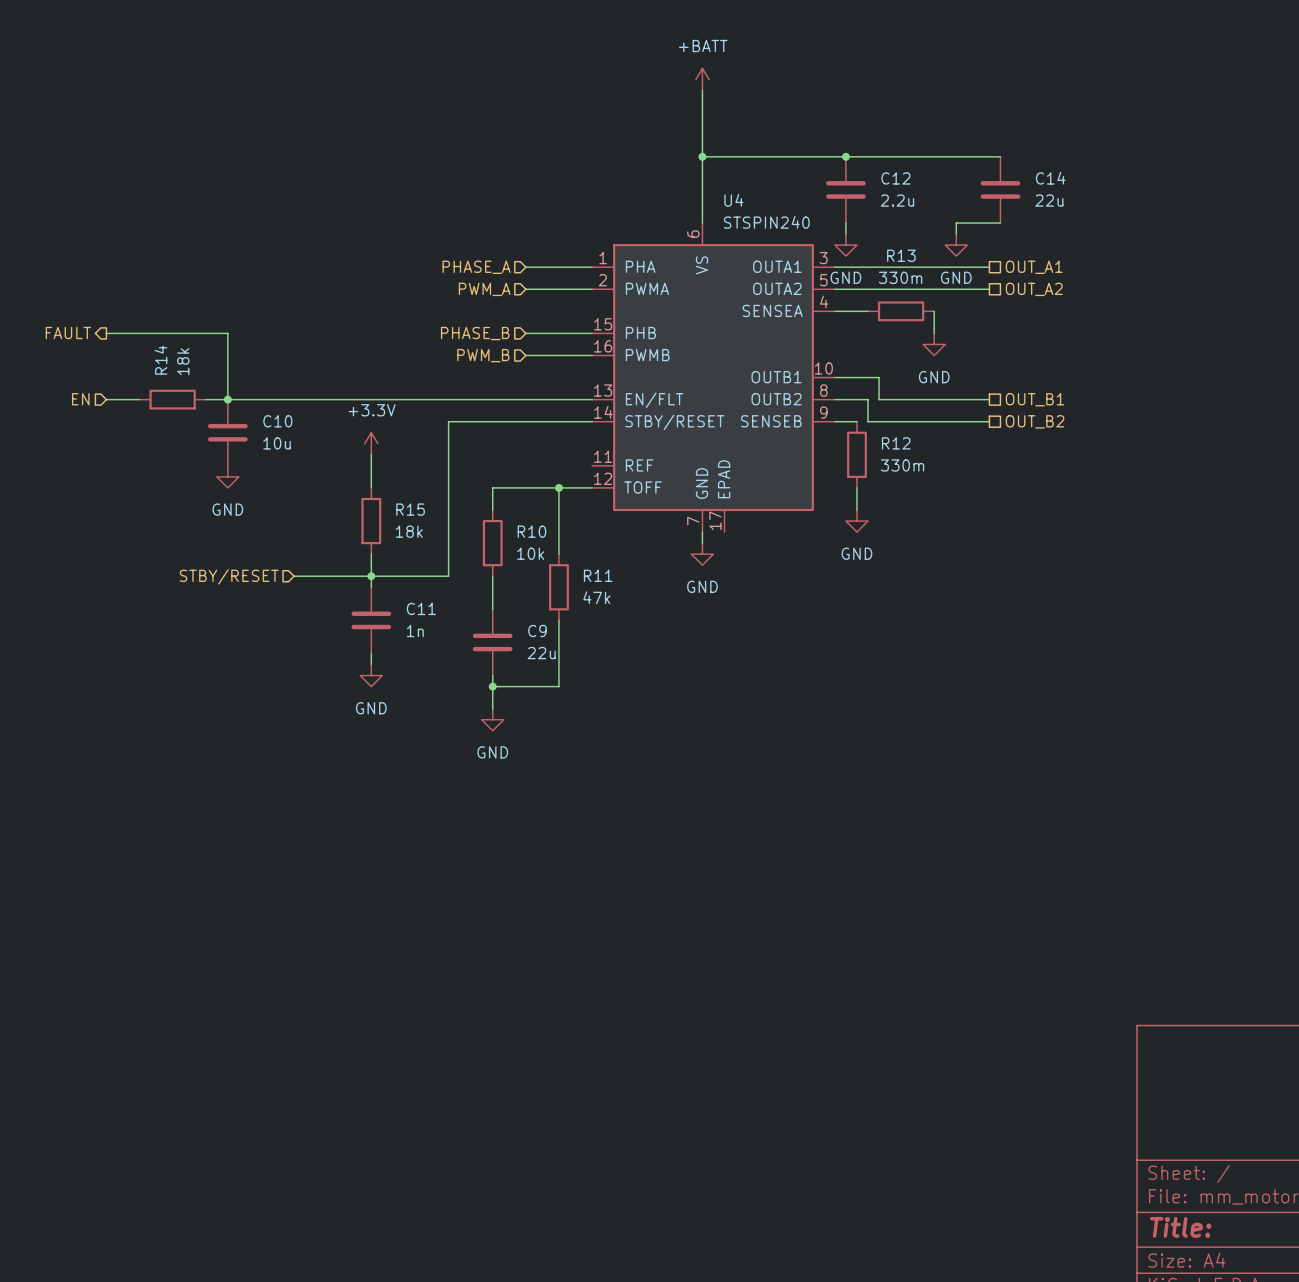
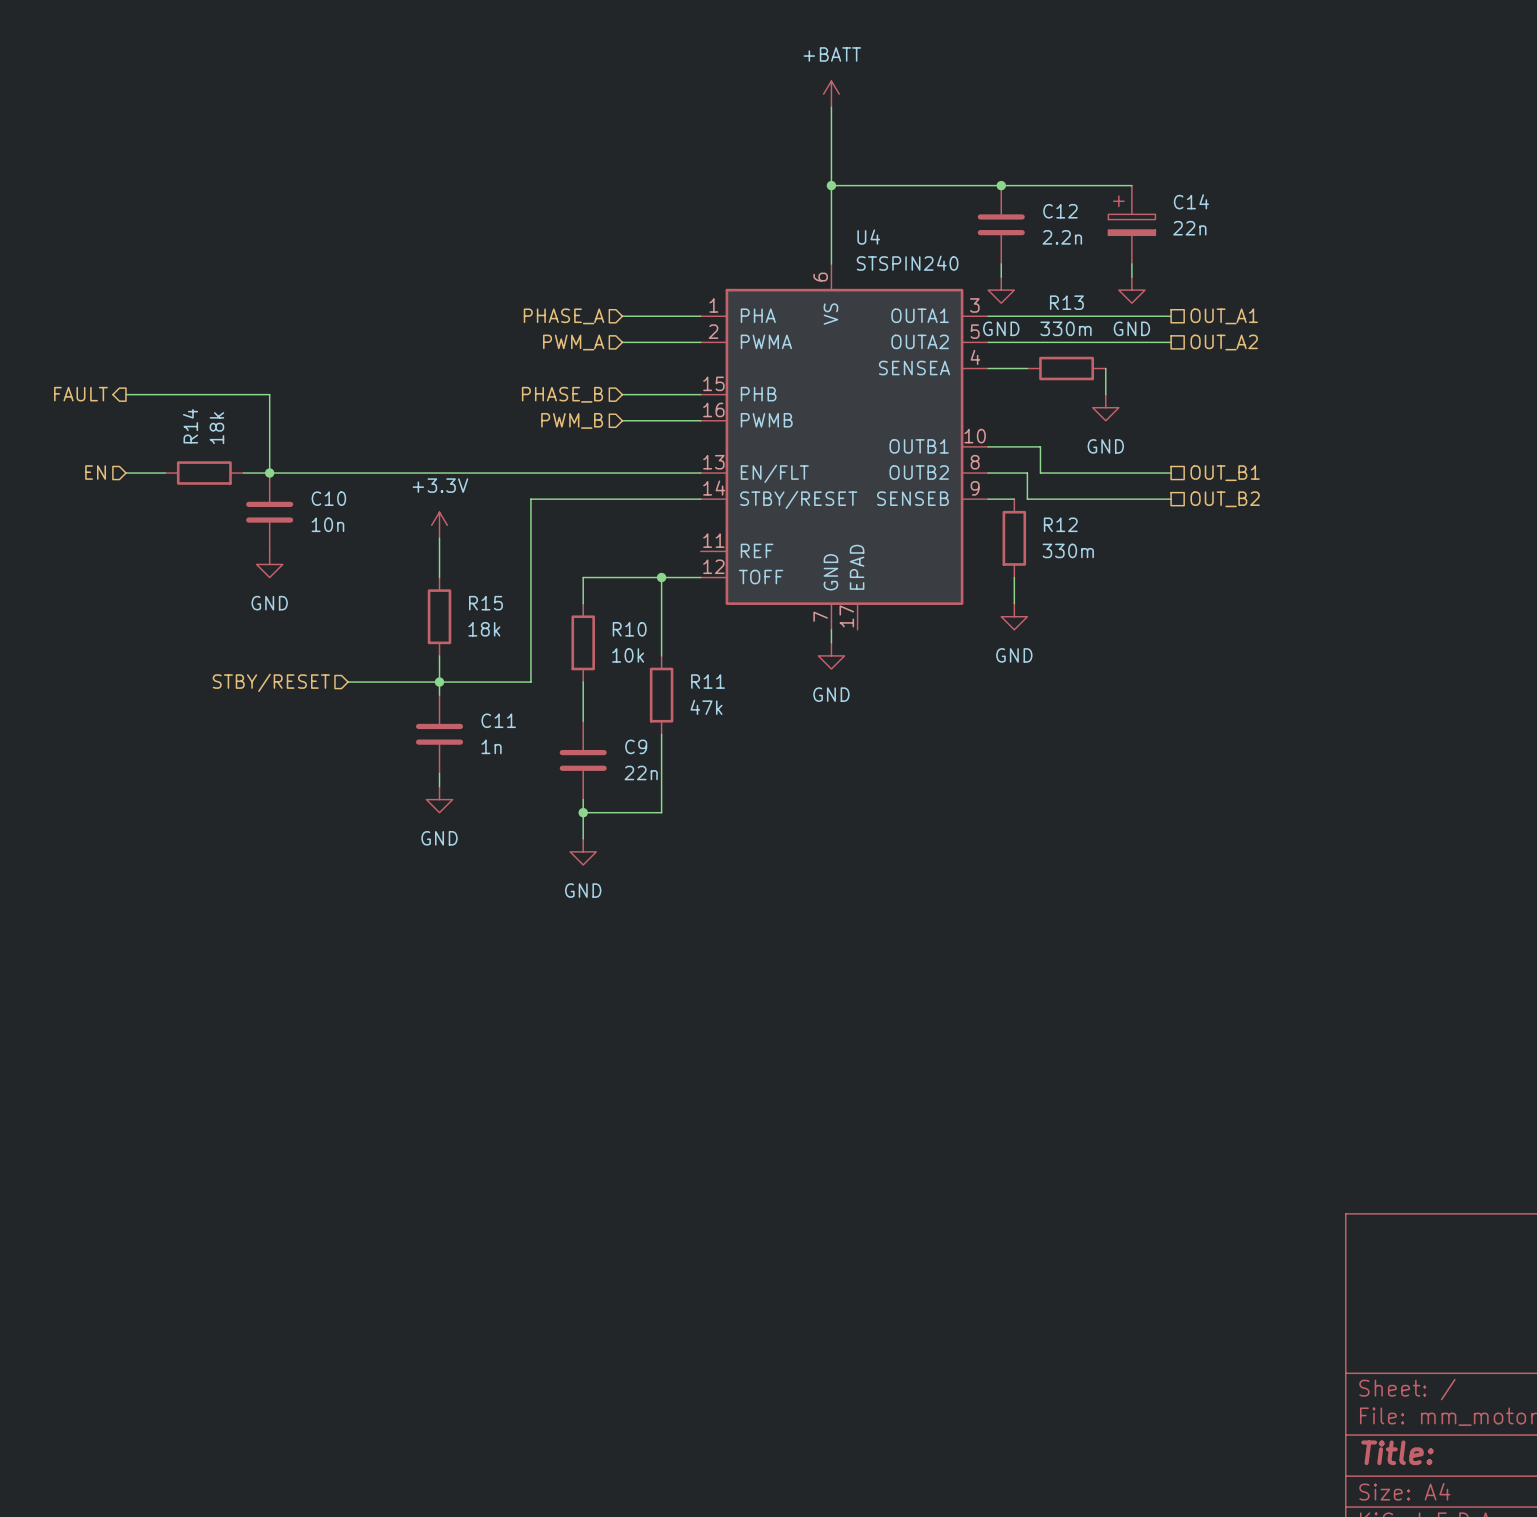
wire: (956, 156) (1000, 156) -> none
C14 symbol: [980, 156, 1021, 224] -> [1108, 185, 1156, 264]
C12 value: 2.2u (897, 200) -> 2.2n (1062, 237)
C14 value: 22u (1049, 200) -> 22n (1189, 228)
wire: (956, 223) (1000, 223) -> none
C10 value: 10u (277, 443) -> 10n (327, 524)
C9 value: 22u (541, 653) -> 22n (641, 773)

